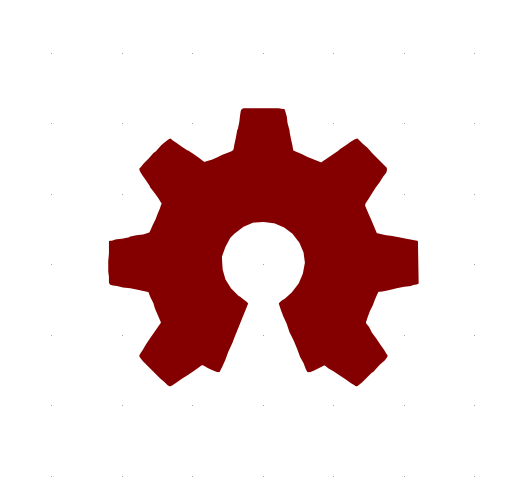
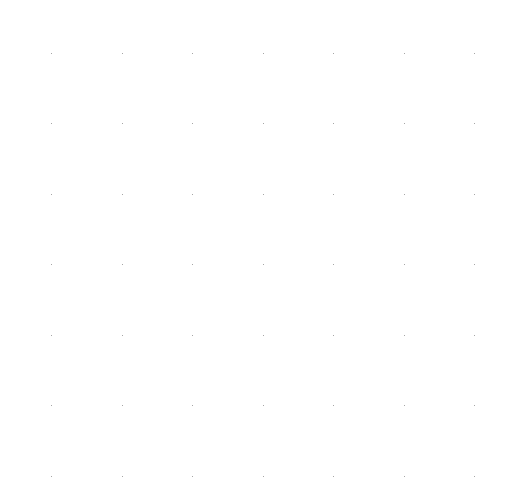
power symbol: (263, 247) -> none

